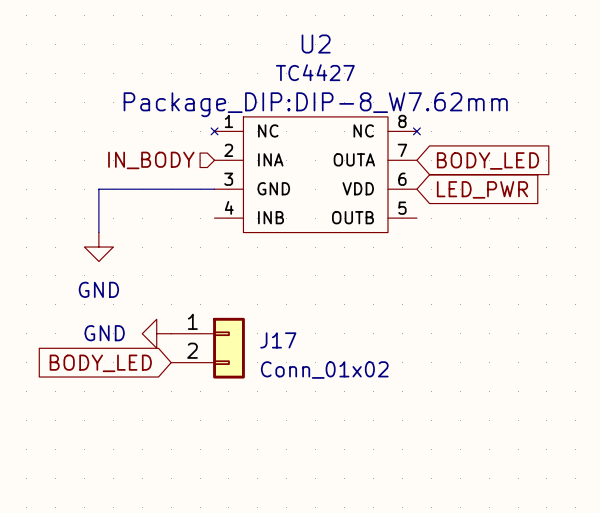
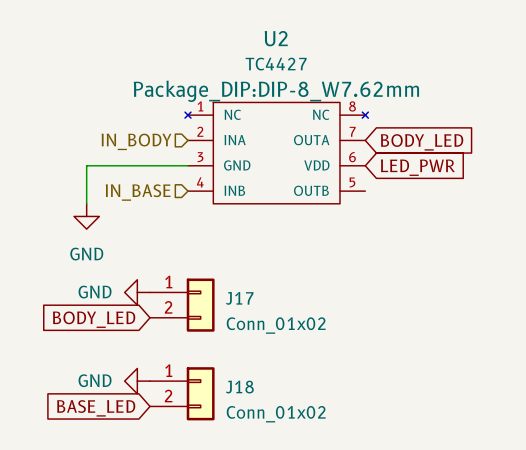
hierarchical label: none -> IN_BASE (138, 192)
power symbol: none -> GND (137, 381)
J18: none -> Conn_01x02 (182, 393)
global label: none -> BASE_LED (96, 408)

